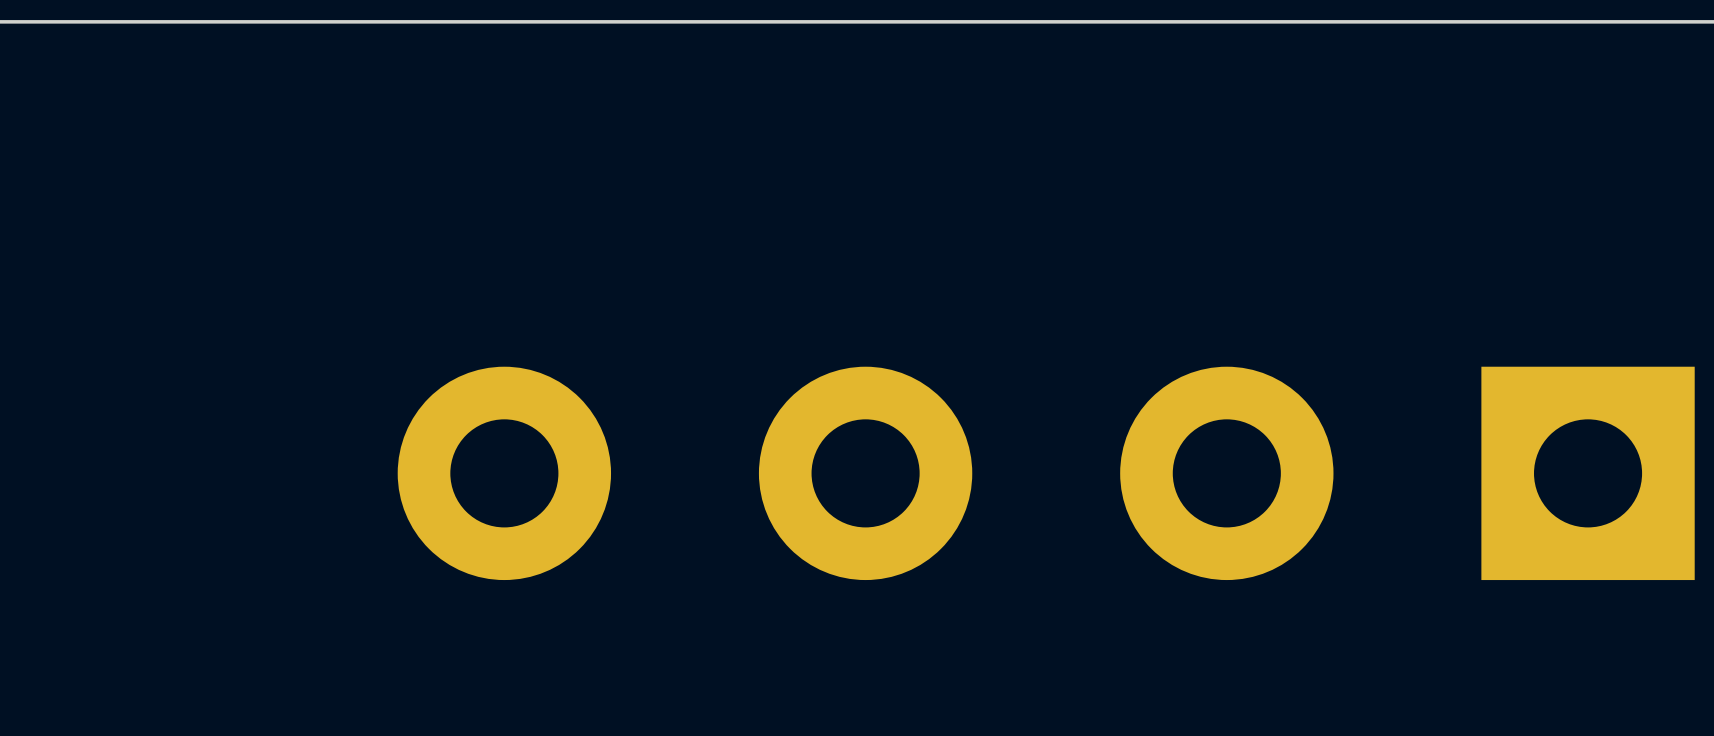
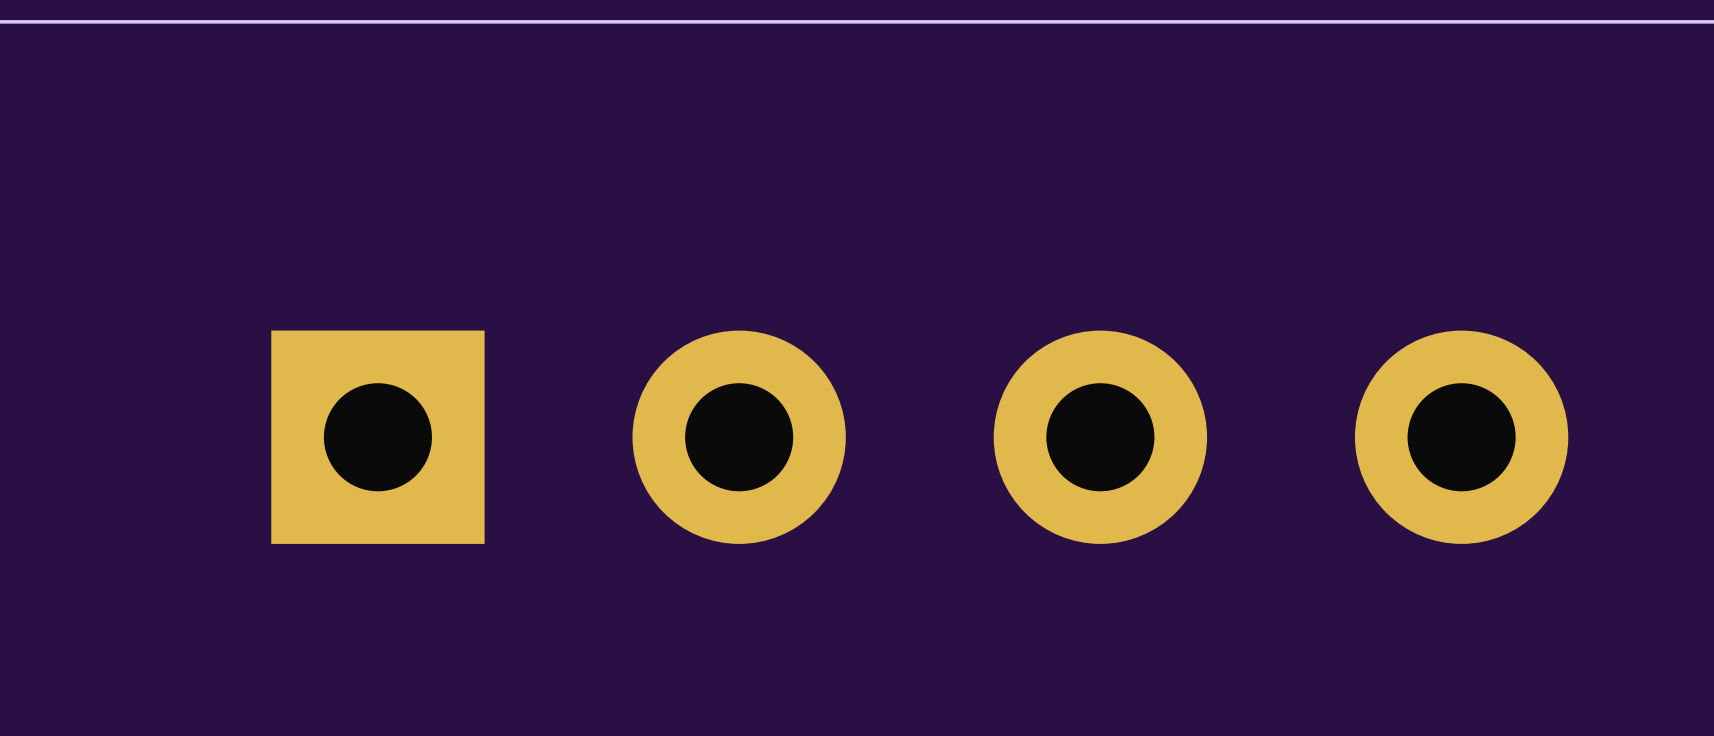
part rotation: 0° (1046, 473) -> 180° (919, 437)

